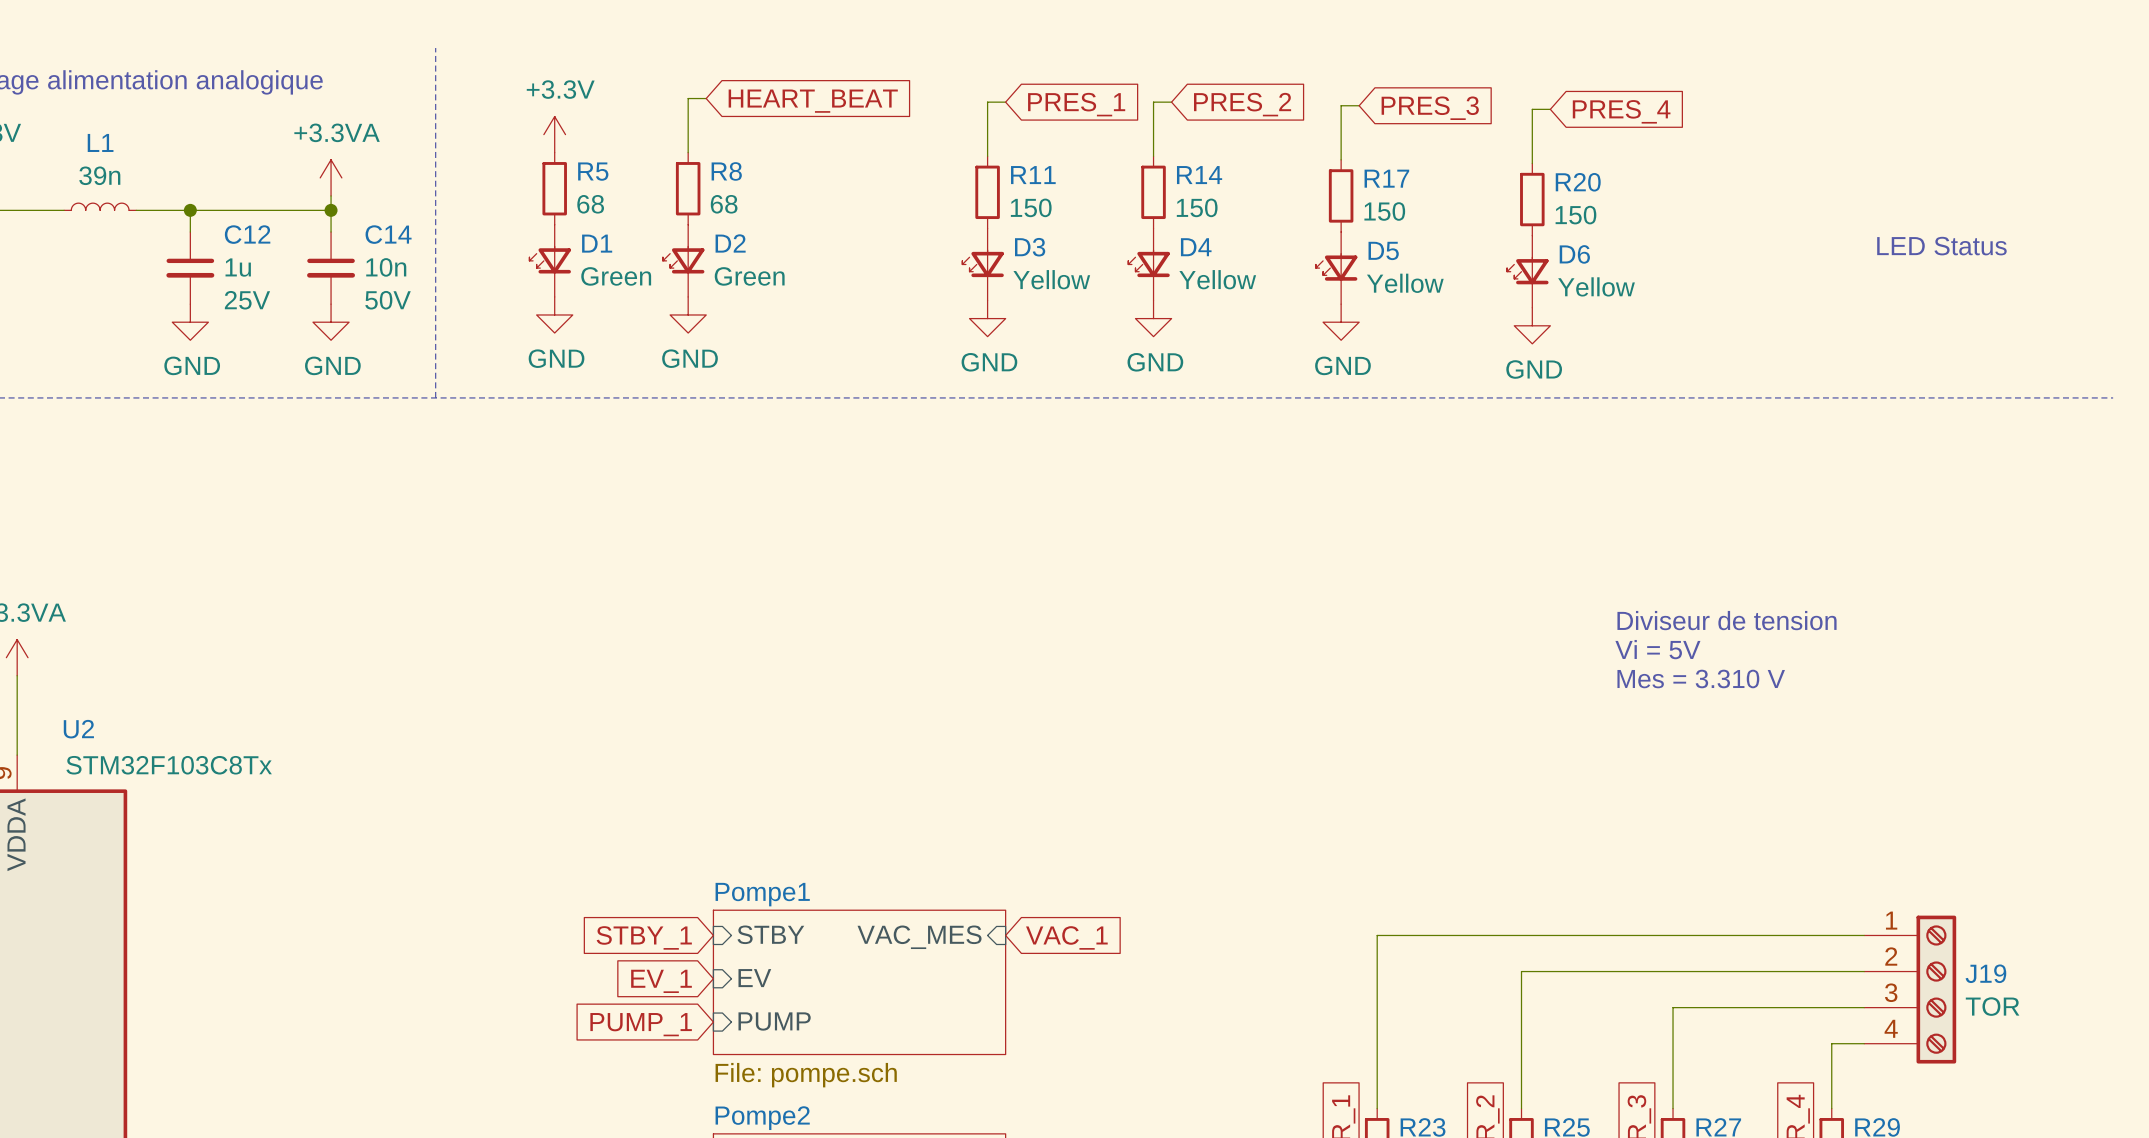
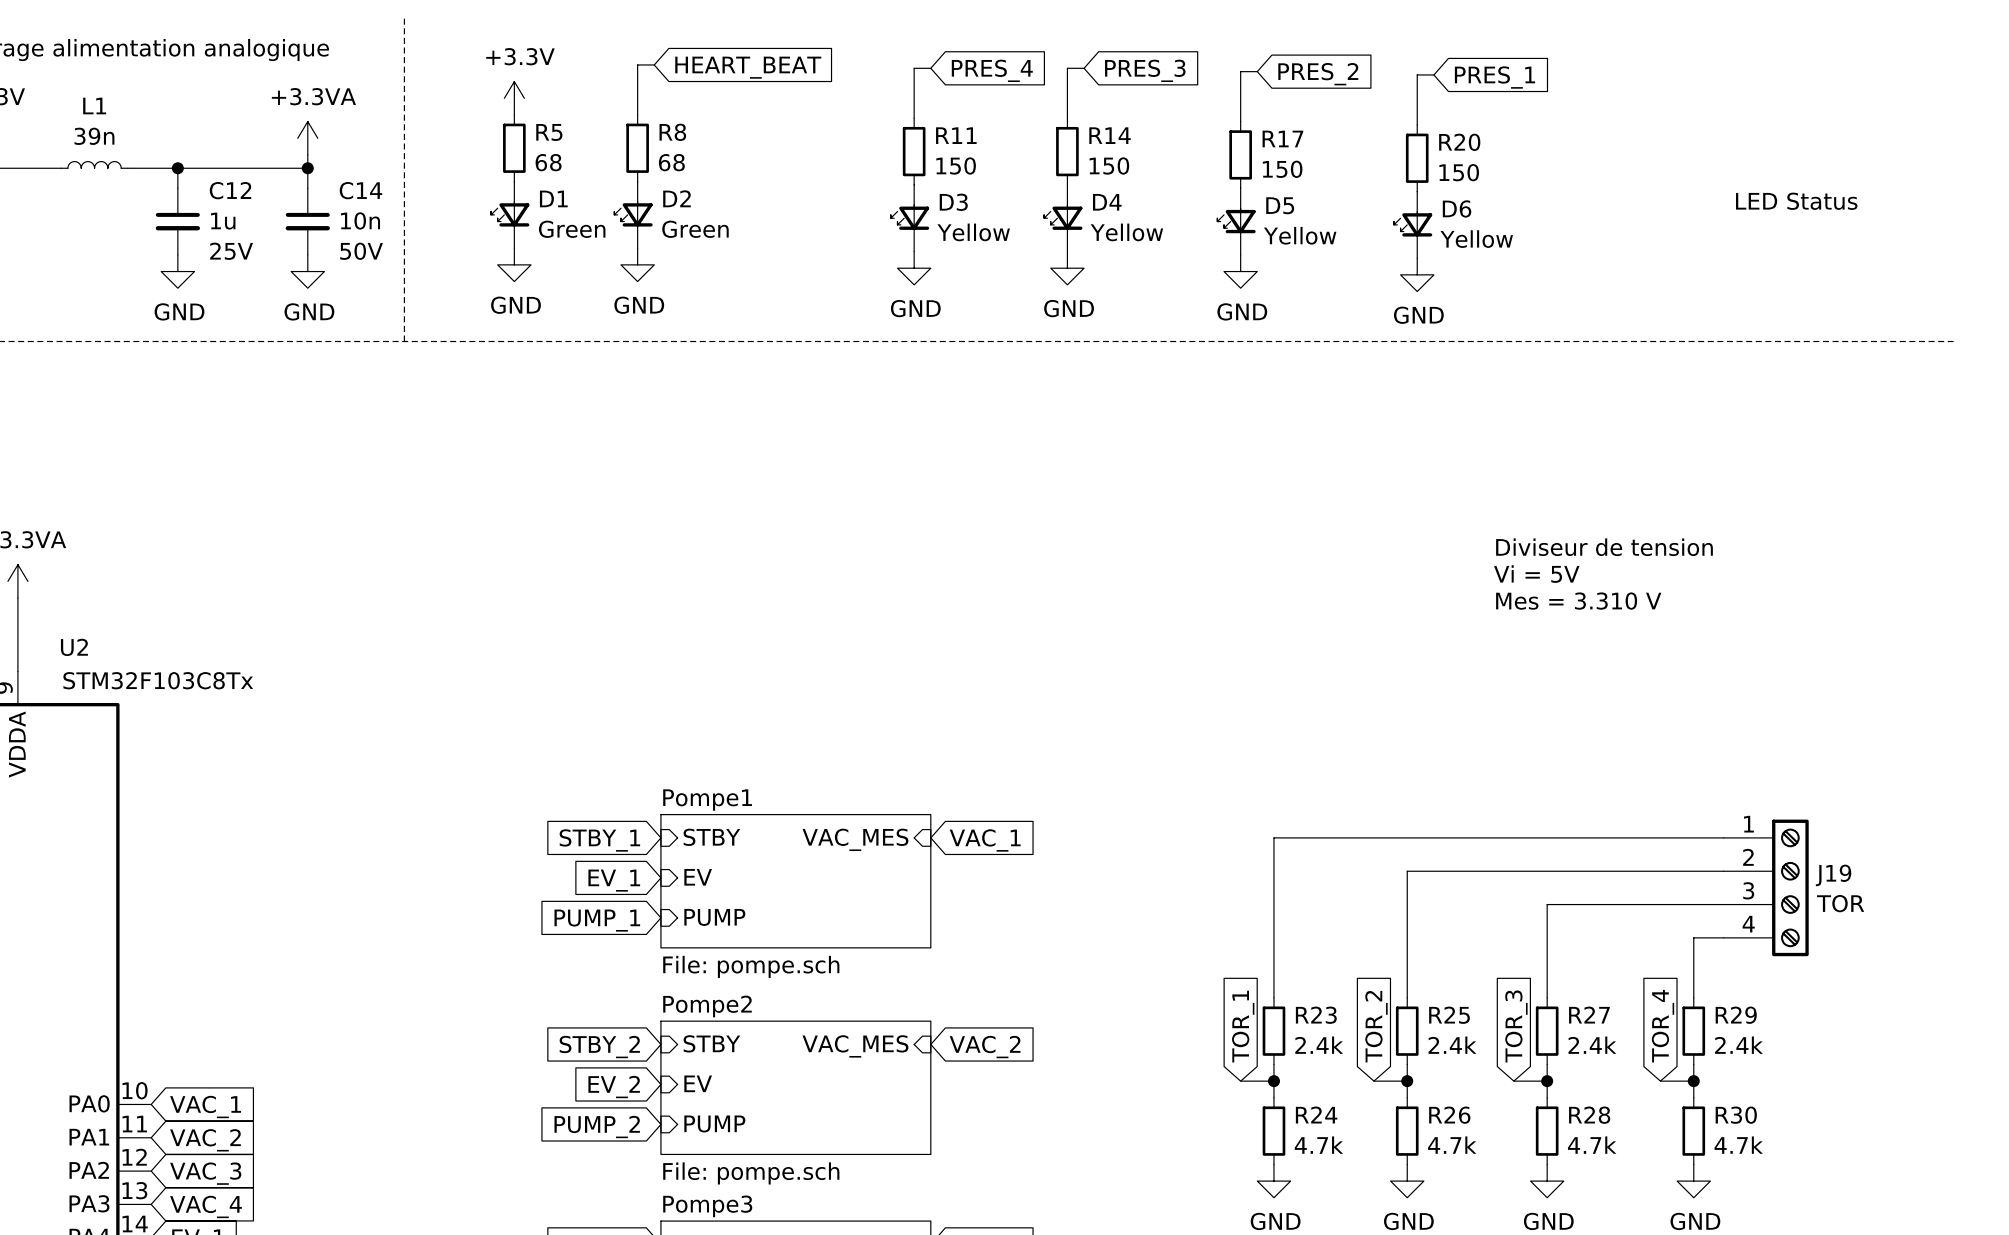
global label: PRES_1 (1076, 104) -> PRES_4 (992, 70)
global label: PRES_2 (1242, 104) -> PRES_3 (1145, 70)
global label: PRES_3 (1430, 108) -> PRES_2 (1318, 74)
global label: PRES_4 (1621, 111) -> PRES_1 (1494, 77)

